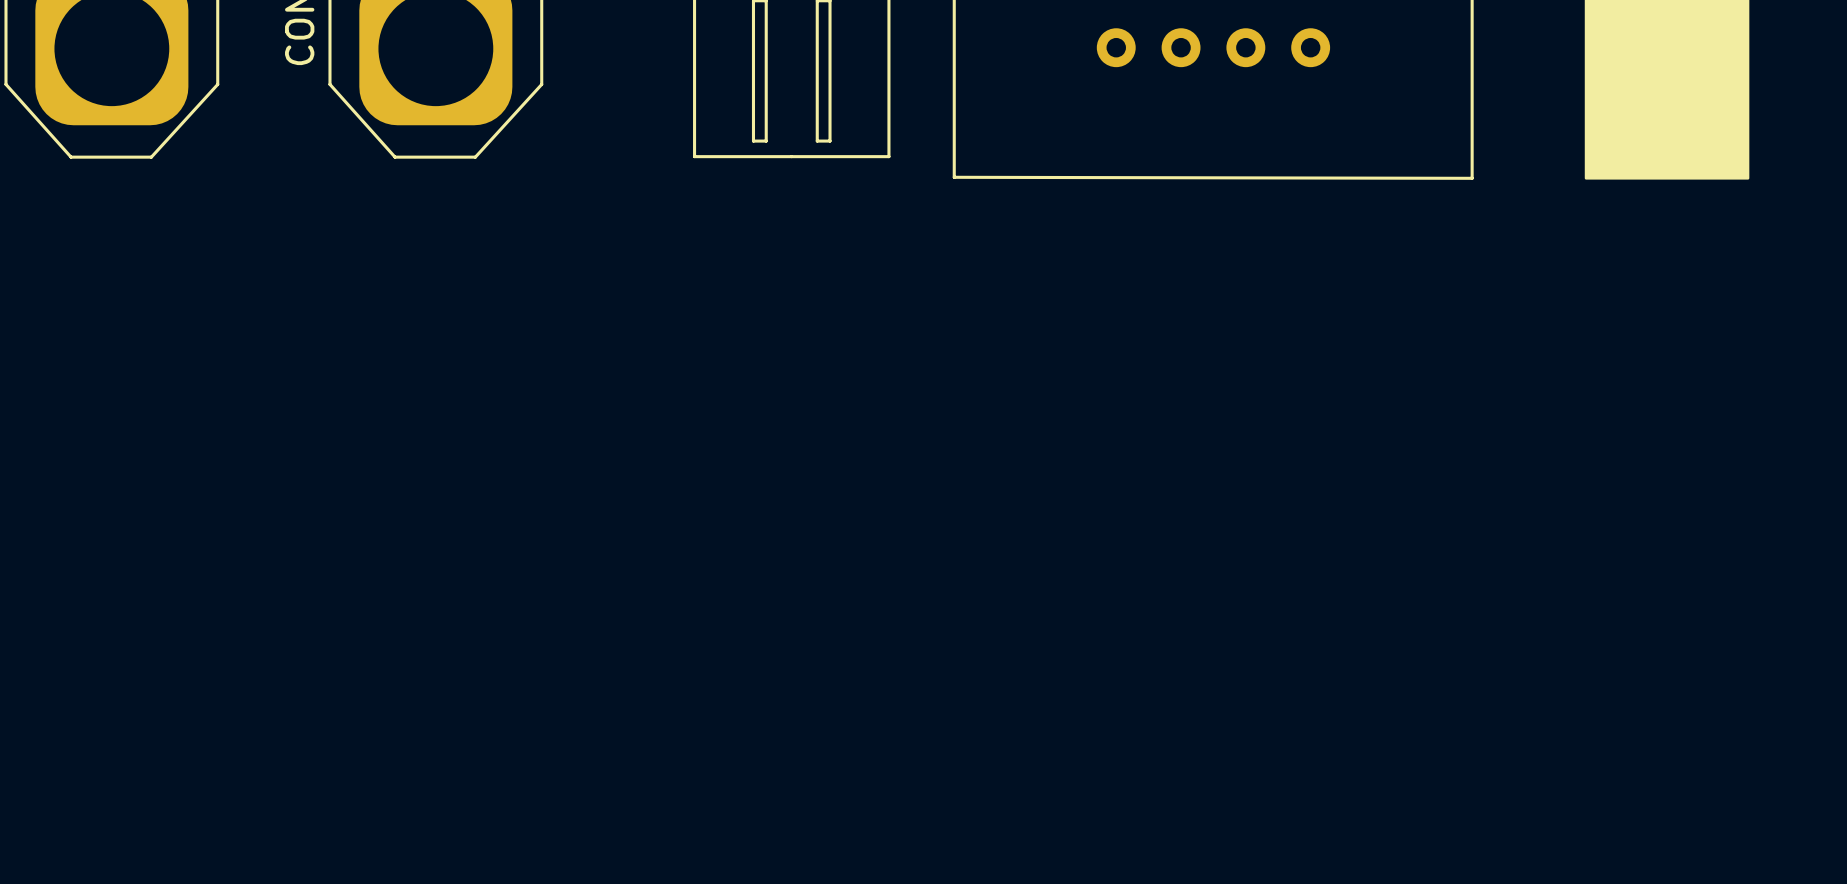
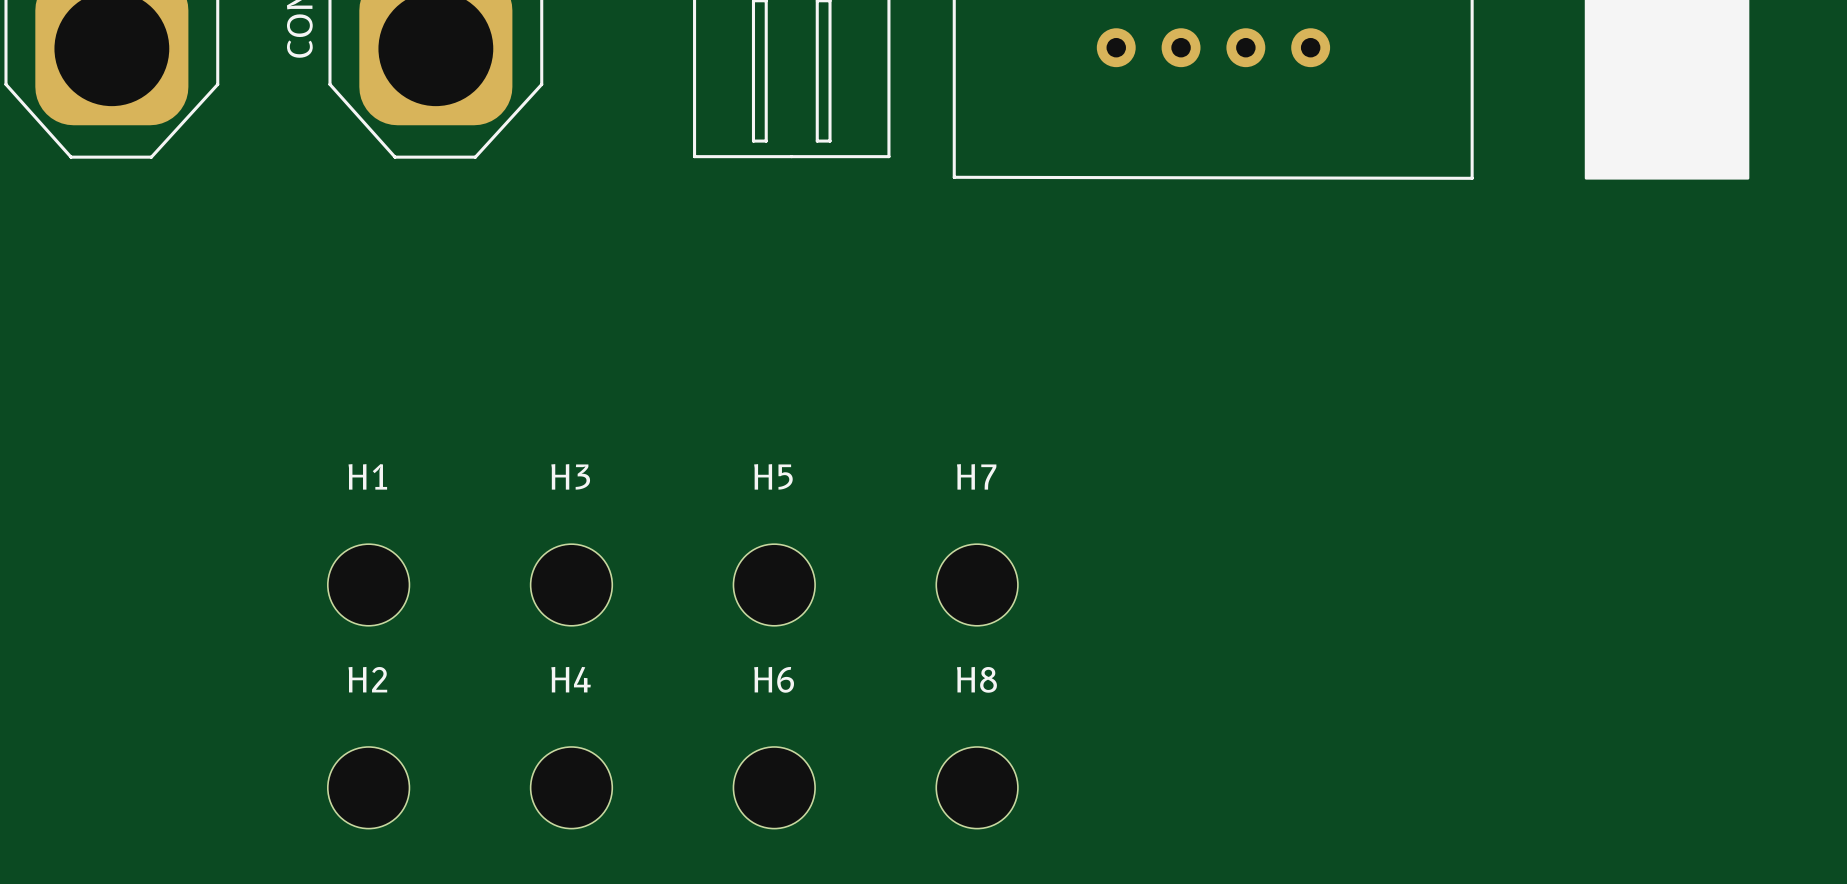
H1: none -> (368, 584)
H3: none -> (571, 584)
H5: none -> (774, 584)
H7: none -> (977, 584)
H2: none -> (368, 787)
H4: none -> (571, 787)
H6: none -> (774, 787)
H8: none -> (977, 787)

